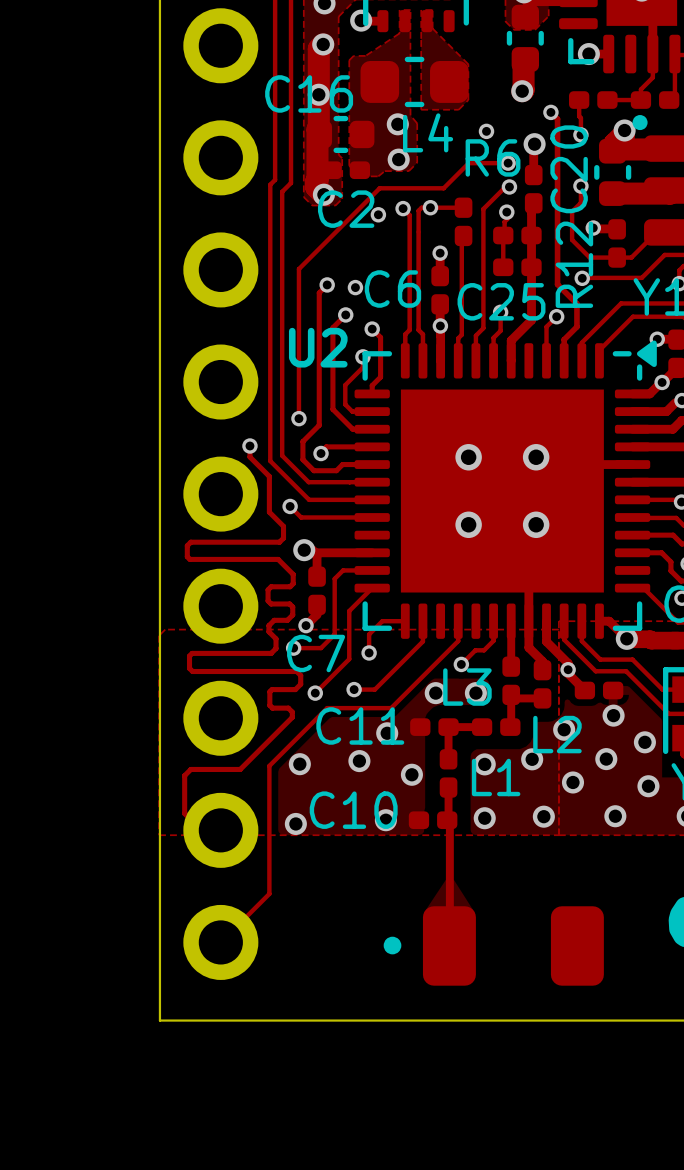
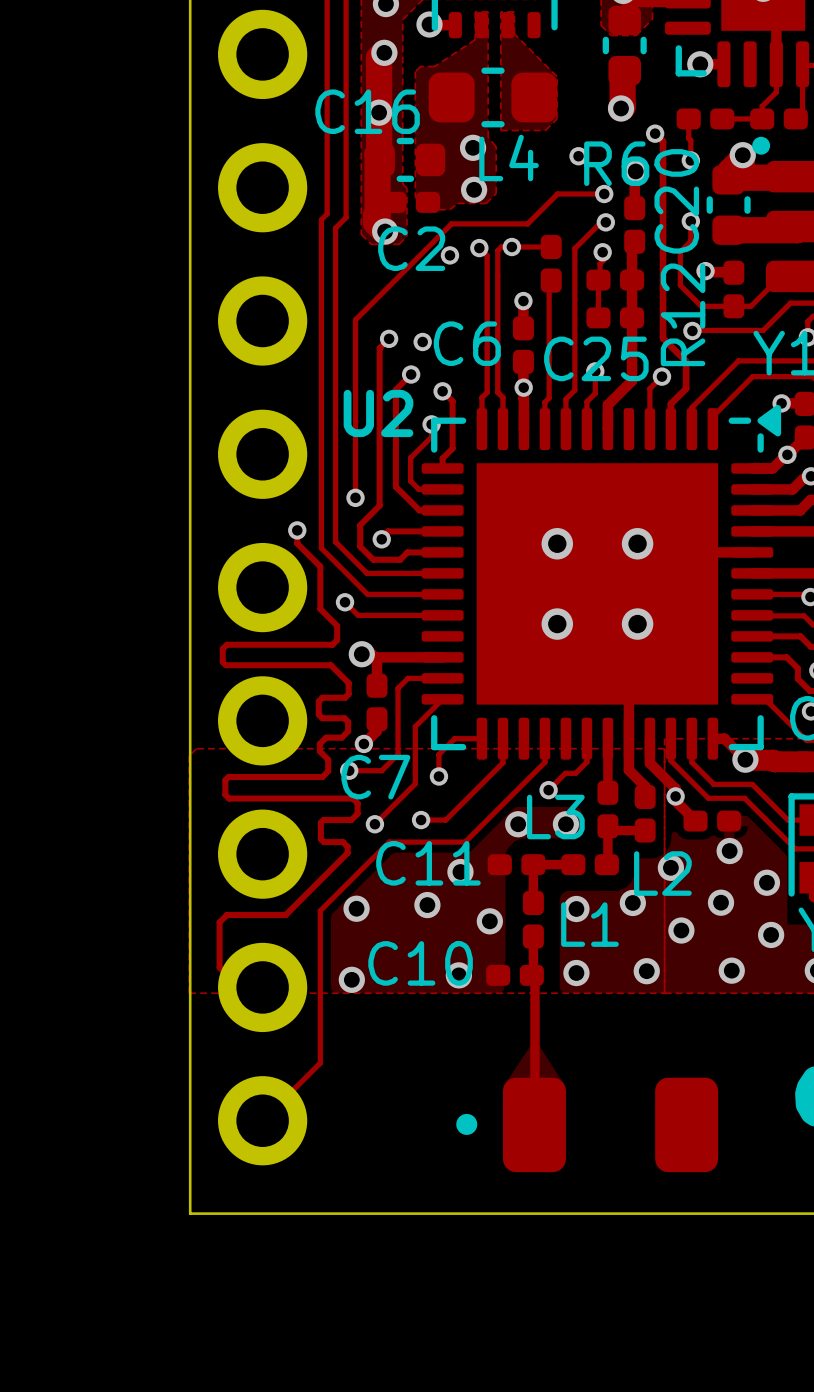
R6 name position: R6 (493, 157) -> R6 (616, 163)

